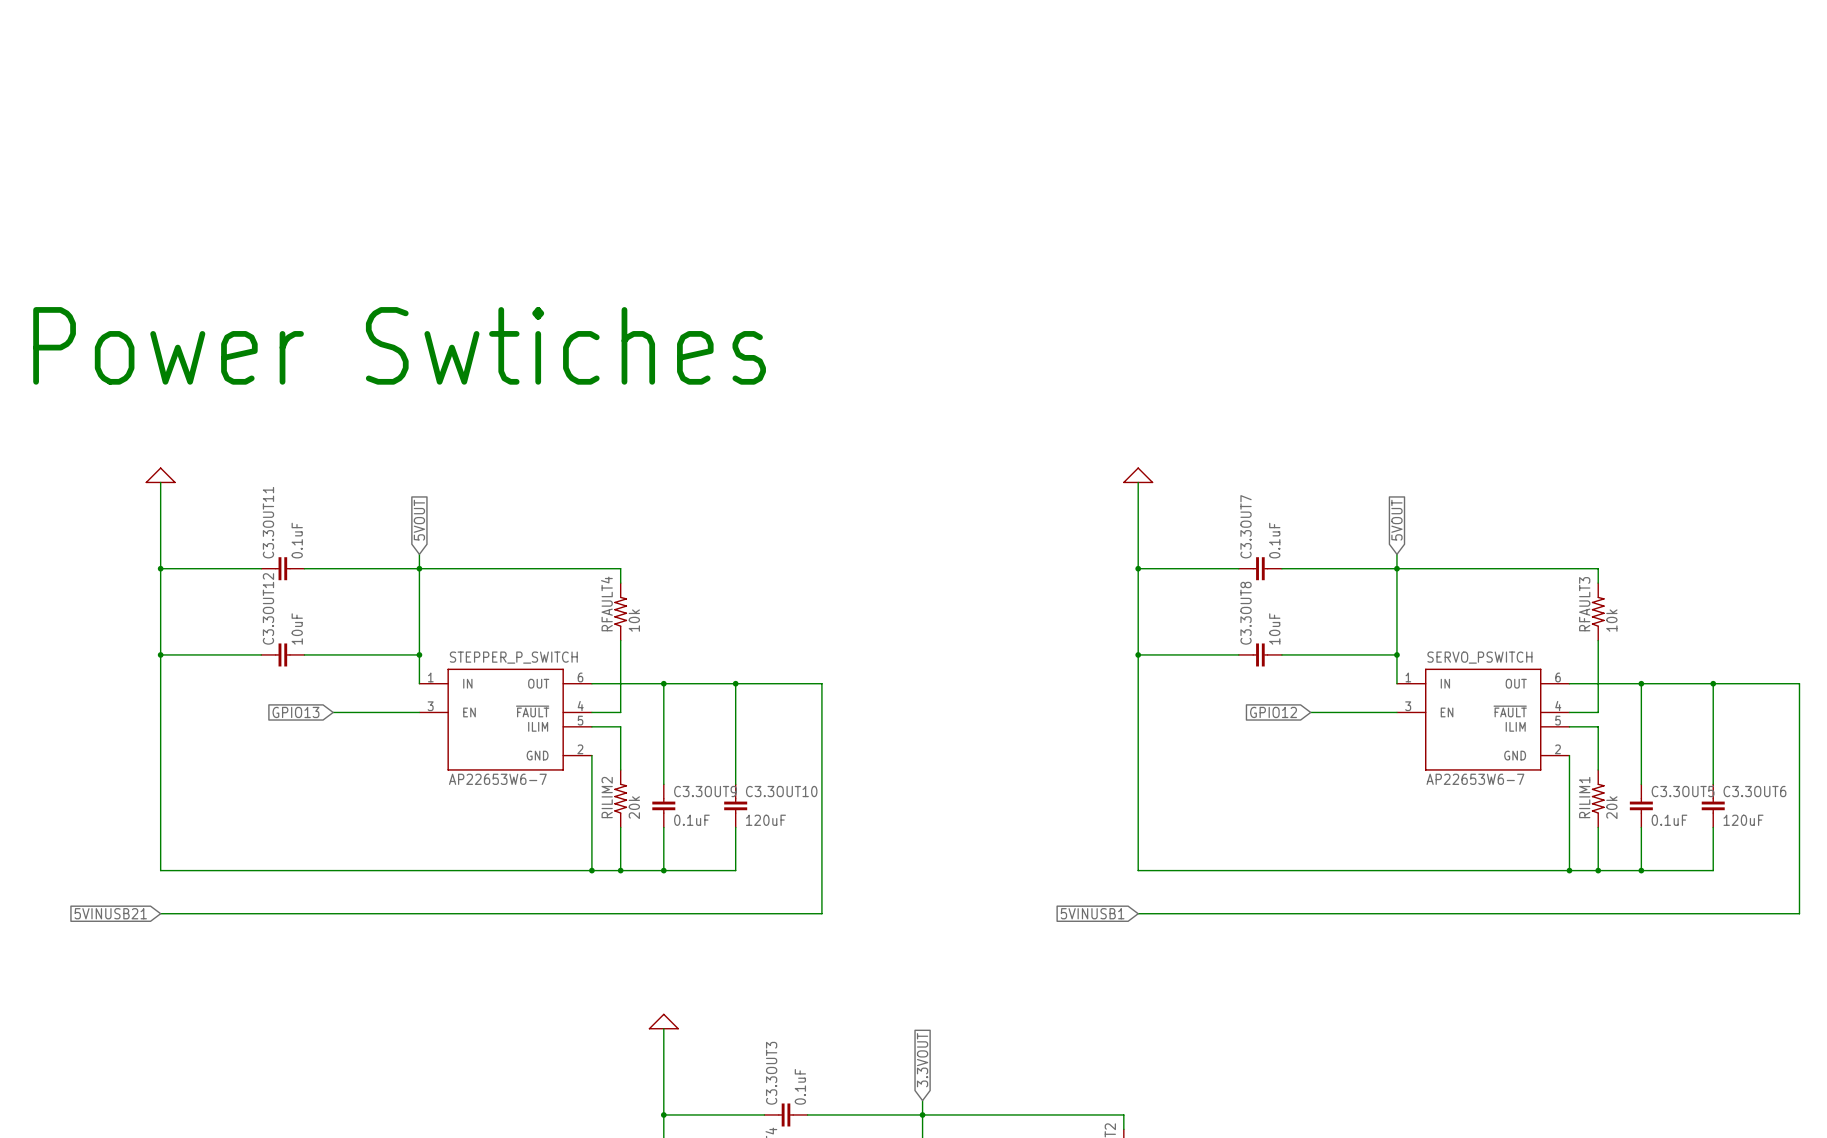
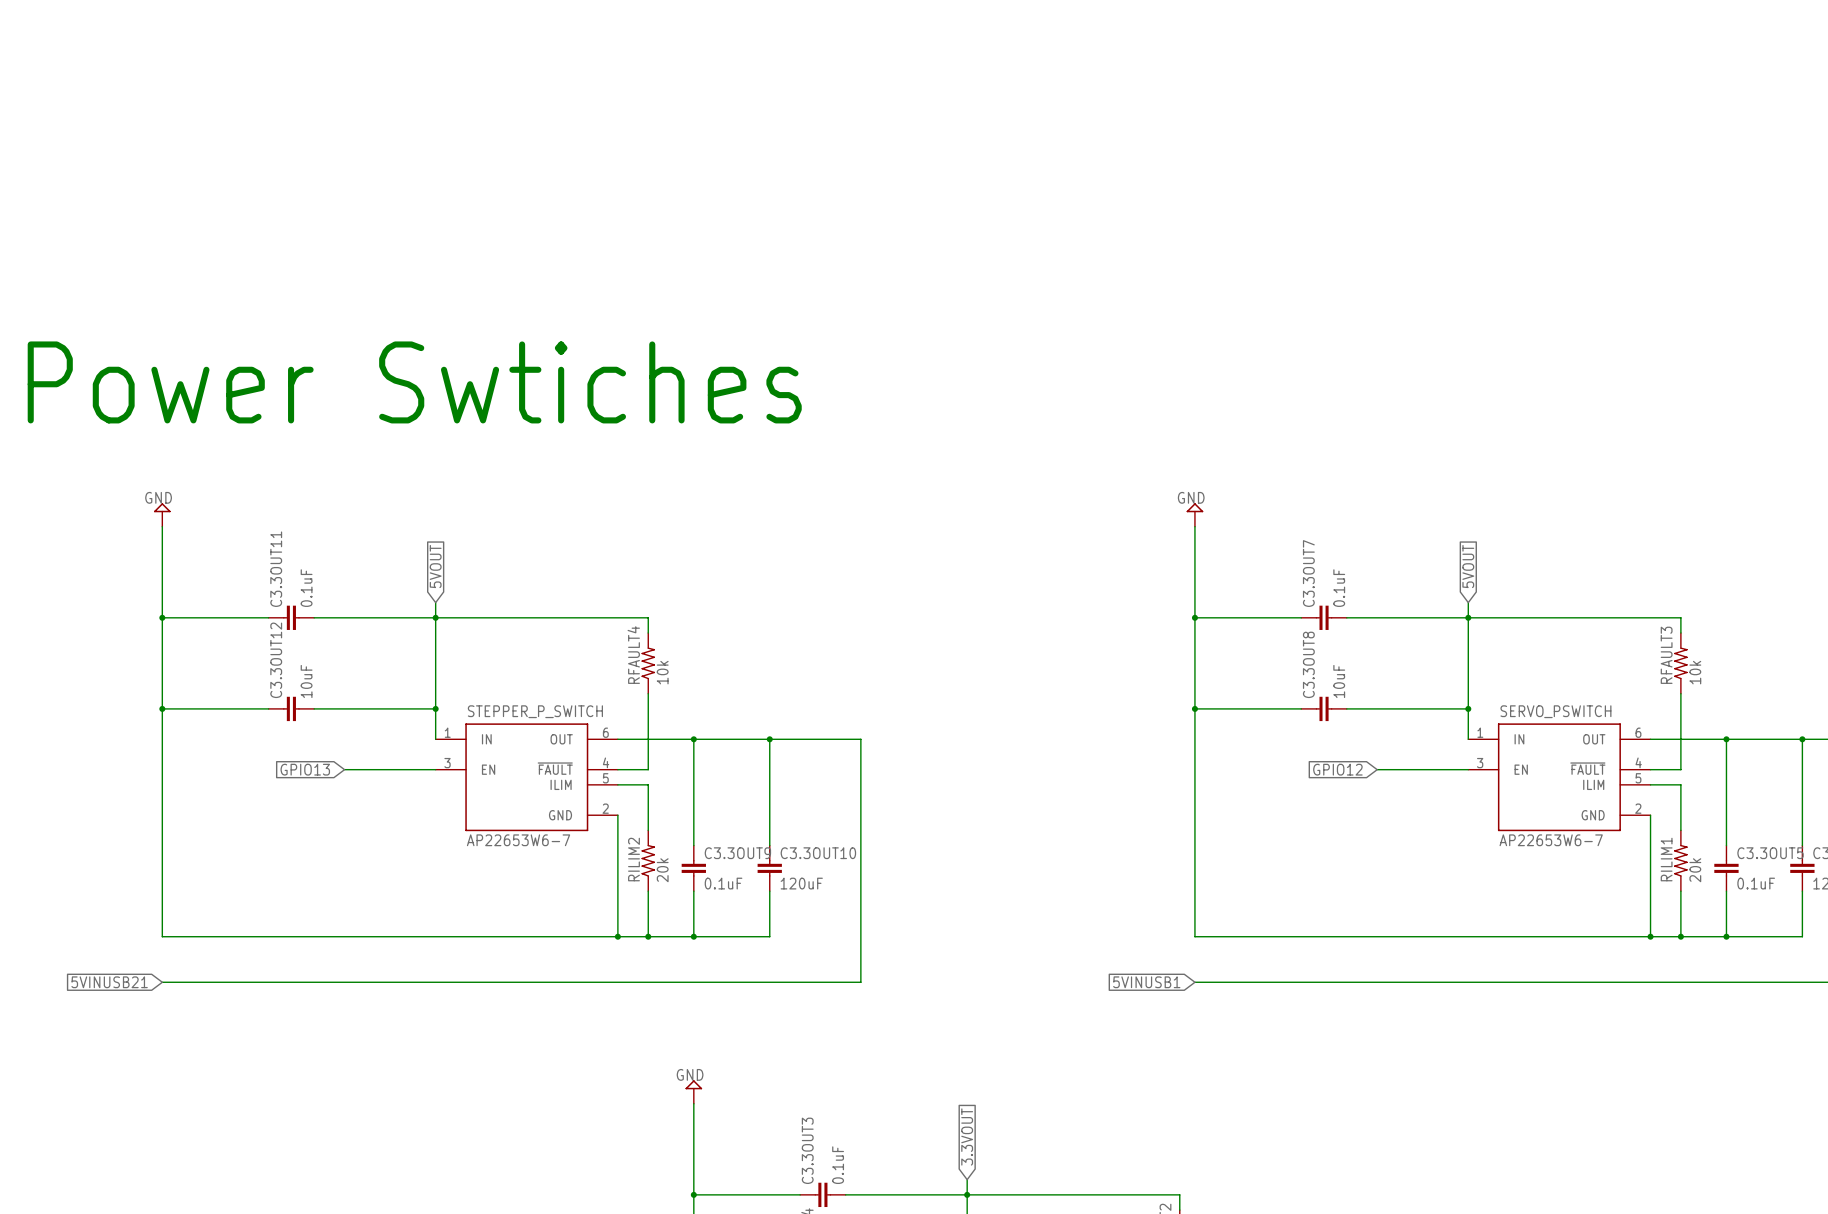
power symbol text: none -> GND (158, 497)
power symbol text: none -> GND (1191, 497)
power symbol shape: [145, 467, 176, 483] -> [153, 503, 171, 527]
power symbol shape: [1123, 467, 1154, 483] -> [1186, 503, 1204, 527]
power symbol text: none -> GND (690, 1074)
power symbol shape: [649, 1013, 679, 1030] -> [685, 1080, 703, 1104]

